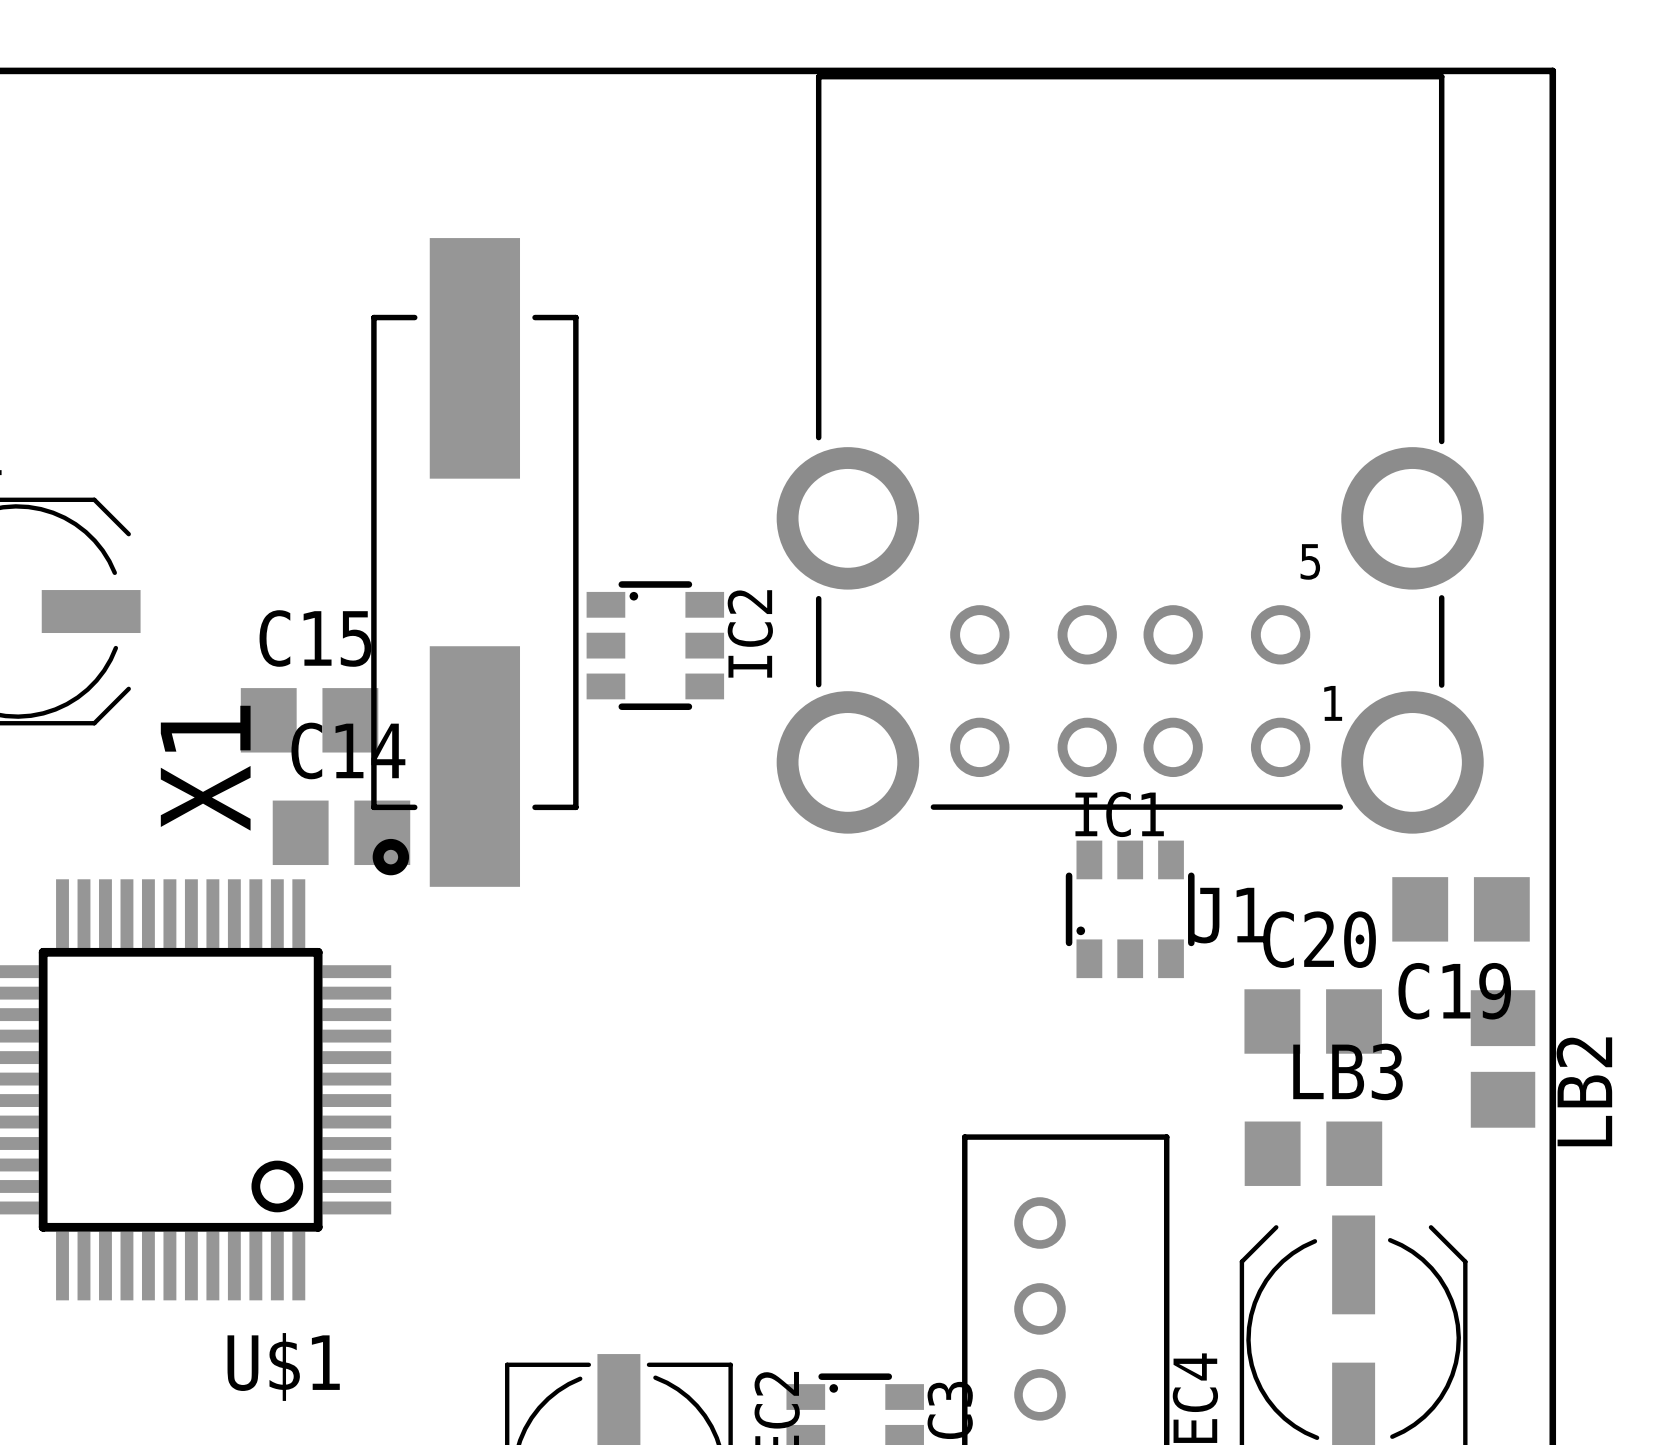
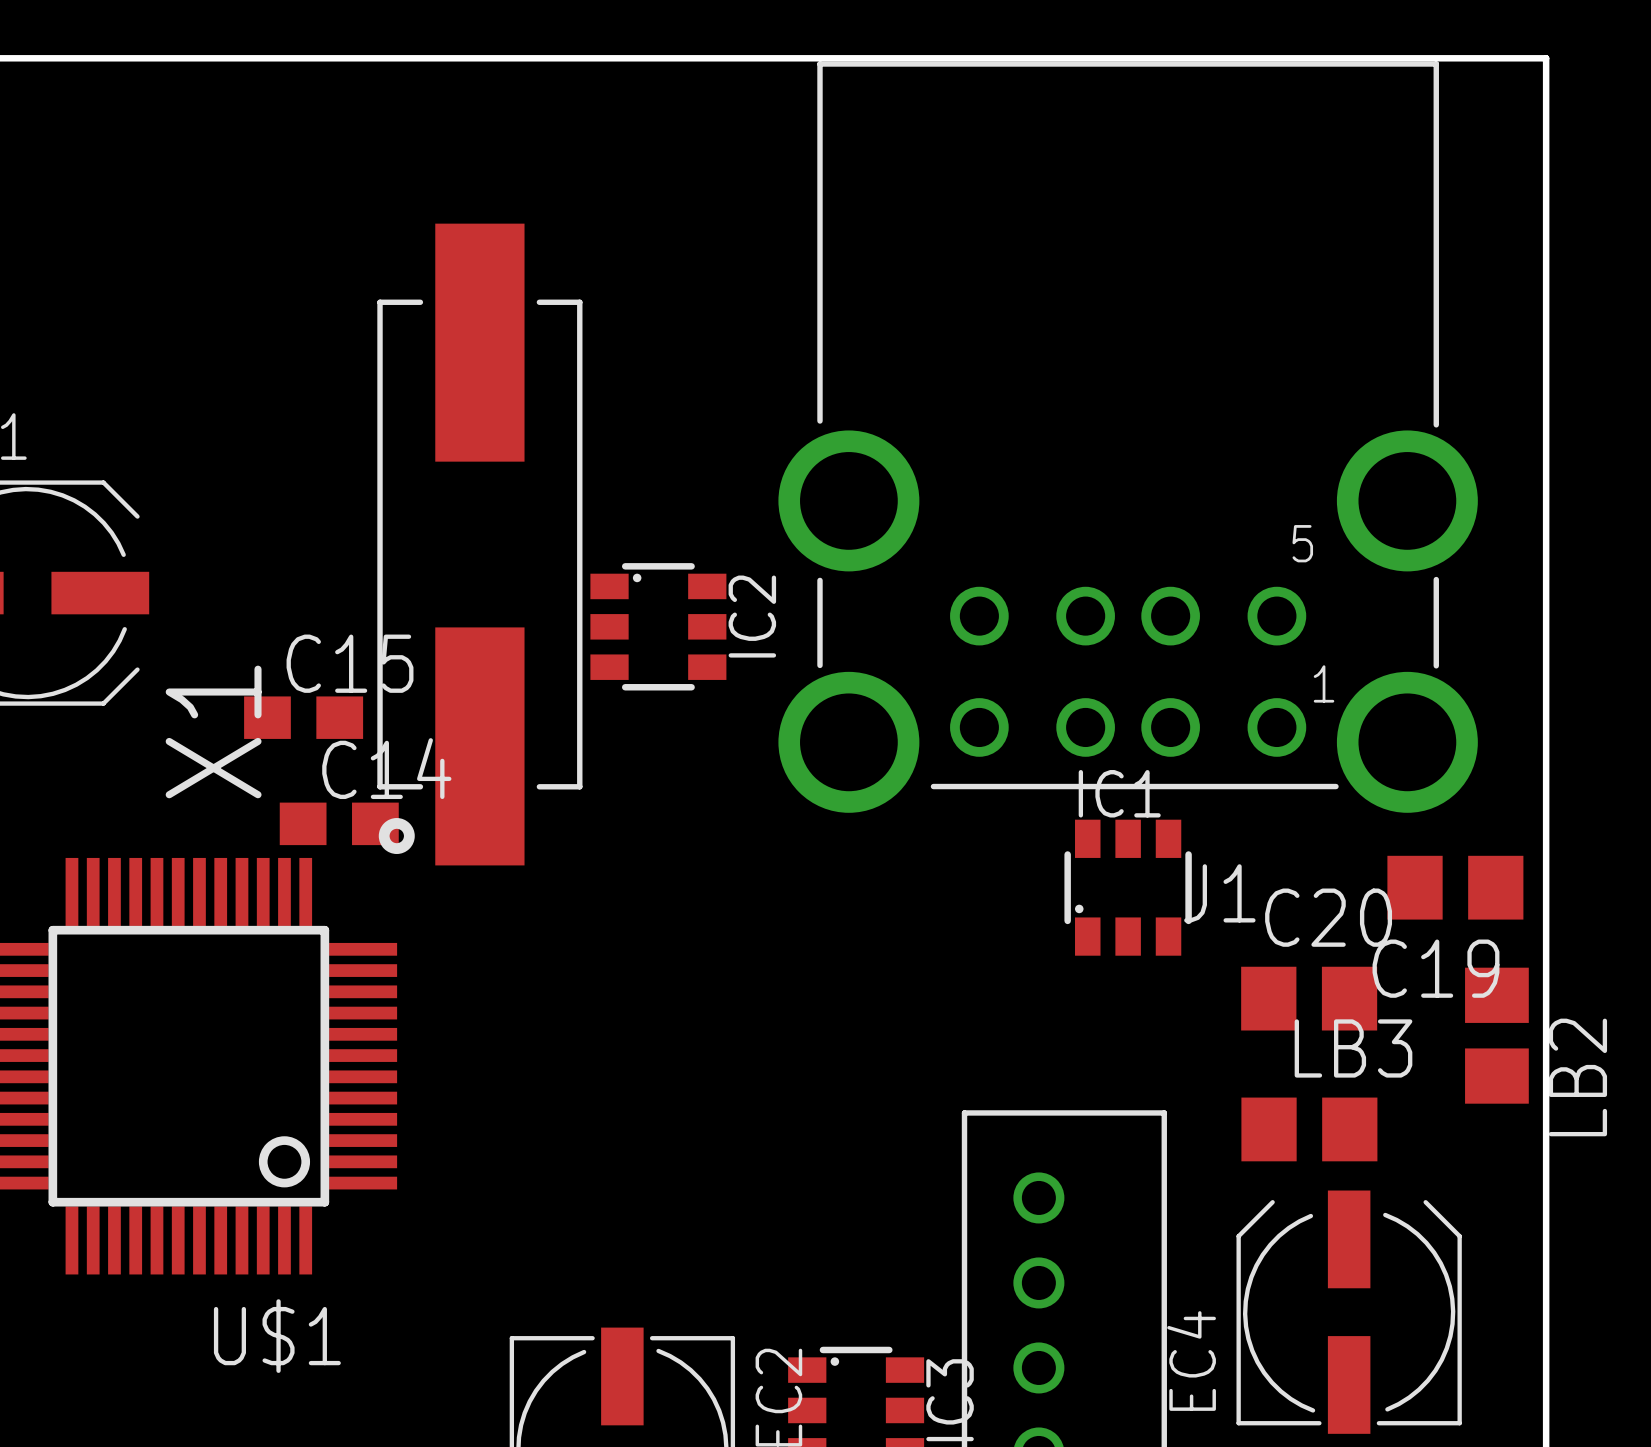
C15 name position: C15 (315, 638) -> C15 (350, 663)
C15 footprint: [240, 688, 379, 753] -> [244, 696, 364, 739]
C14 name position: C14 (348, 750) -> C14 (386, 768)
C14 footprint: [272, 800, 411, 866] -> [279, 802, 399, 846]

